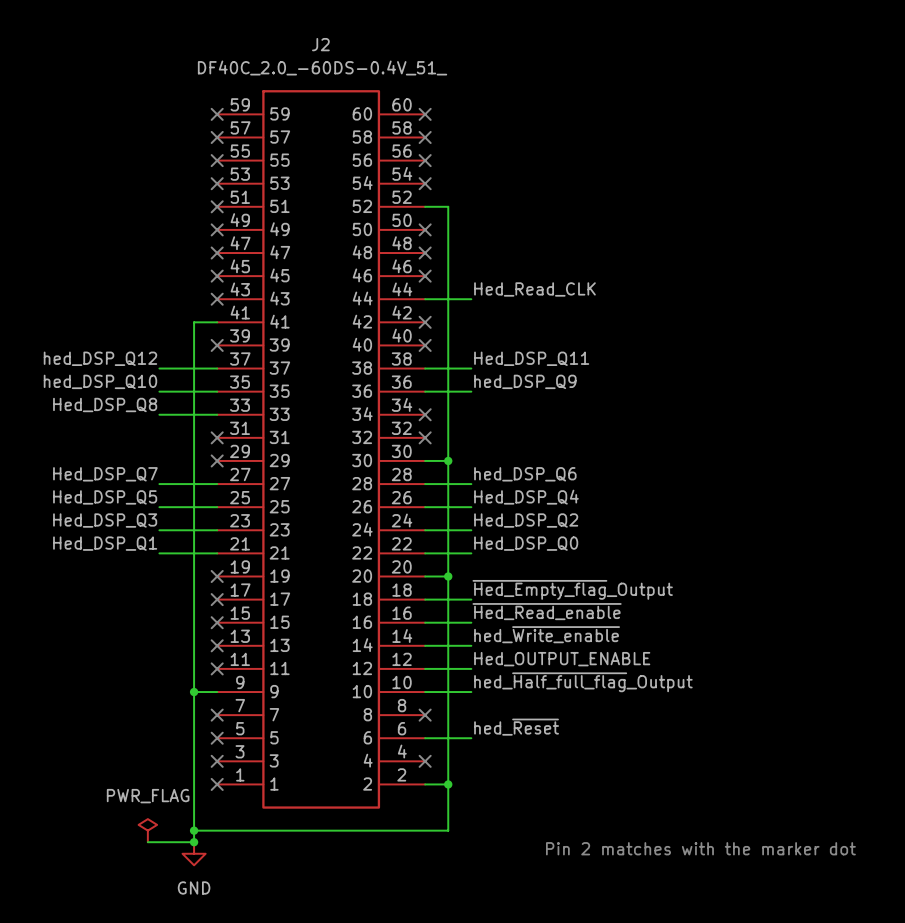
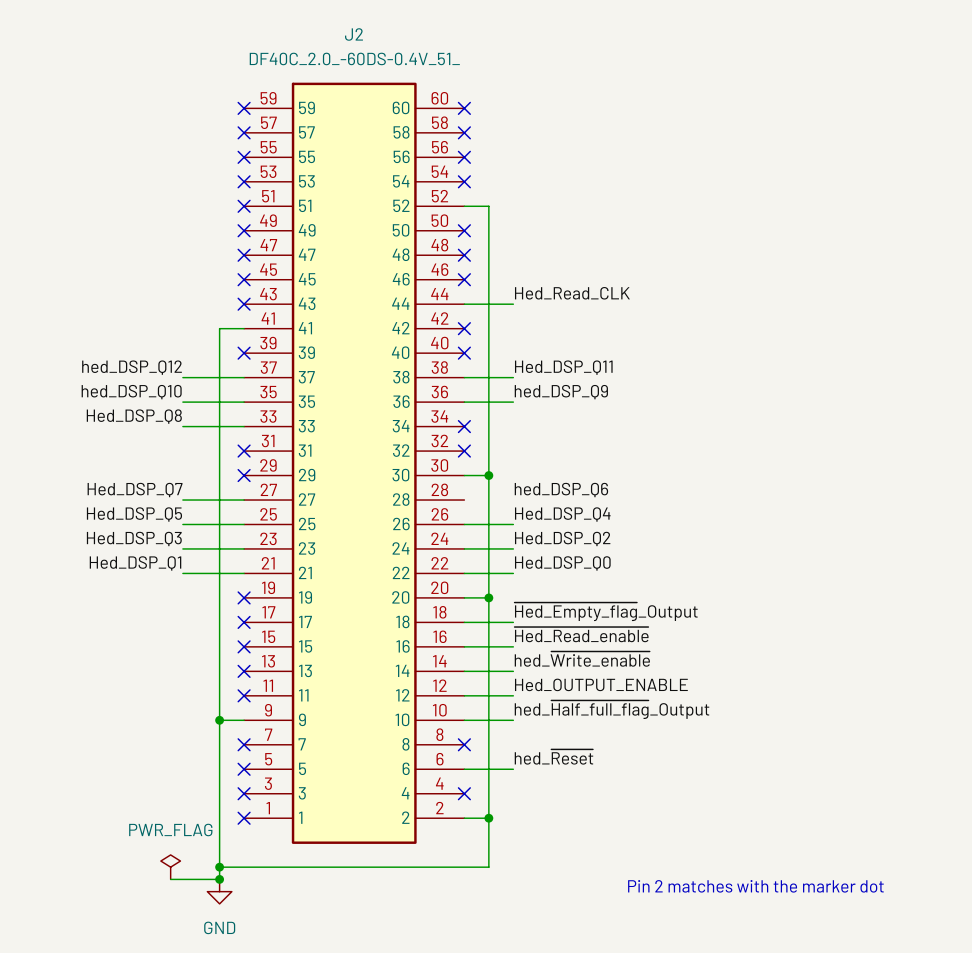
wire: (425, 484) (471, 484) -> none

